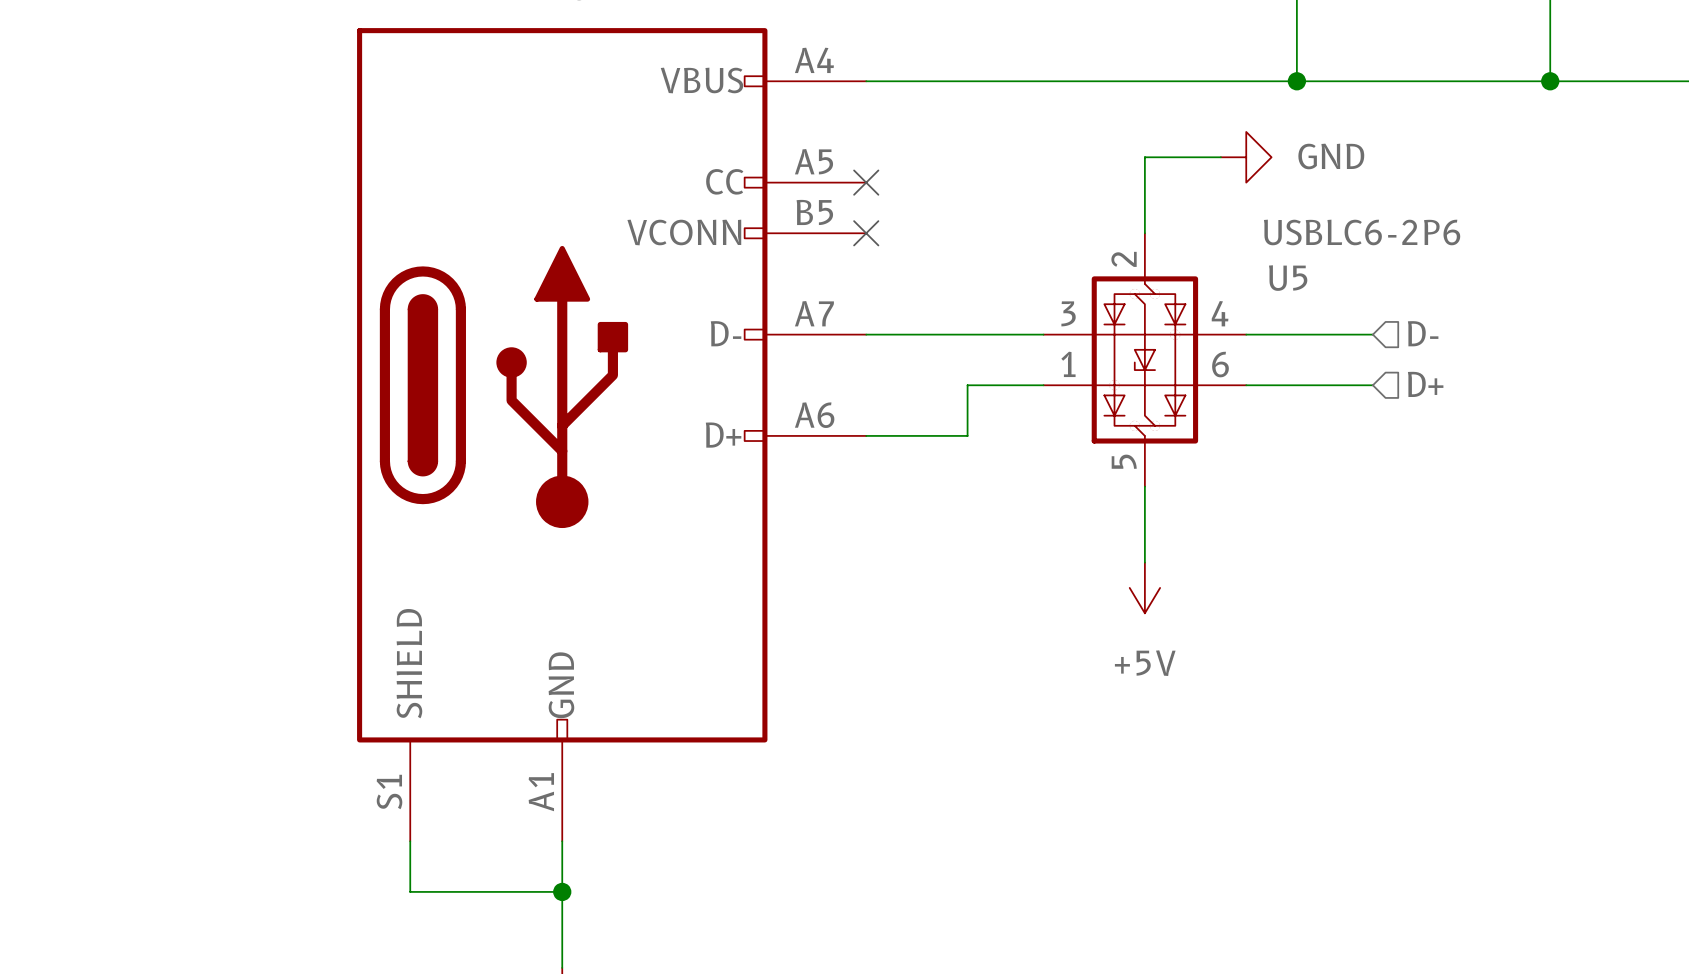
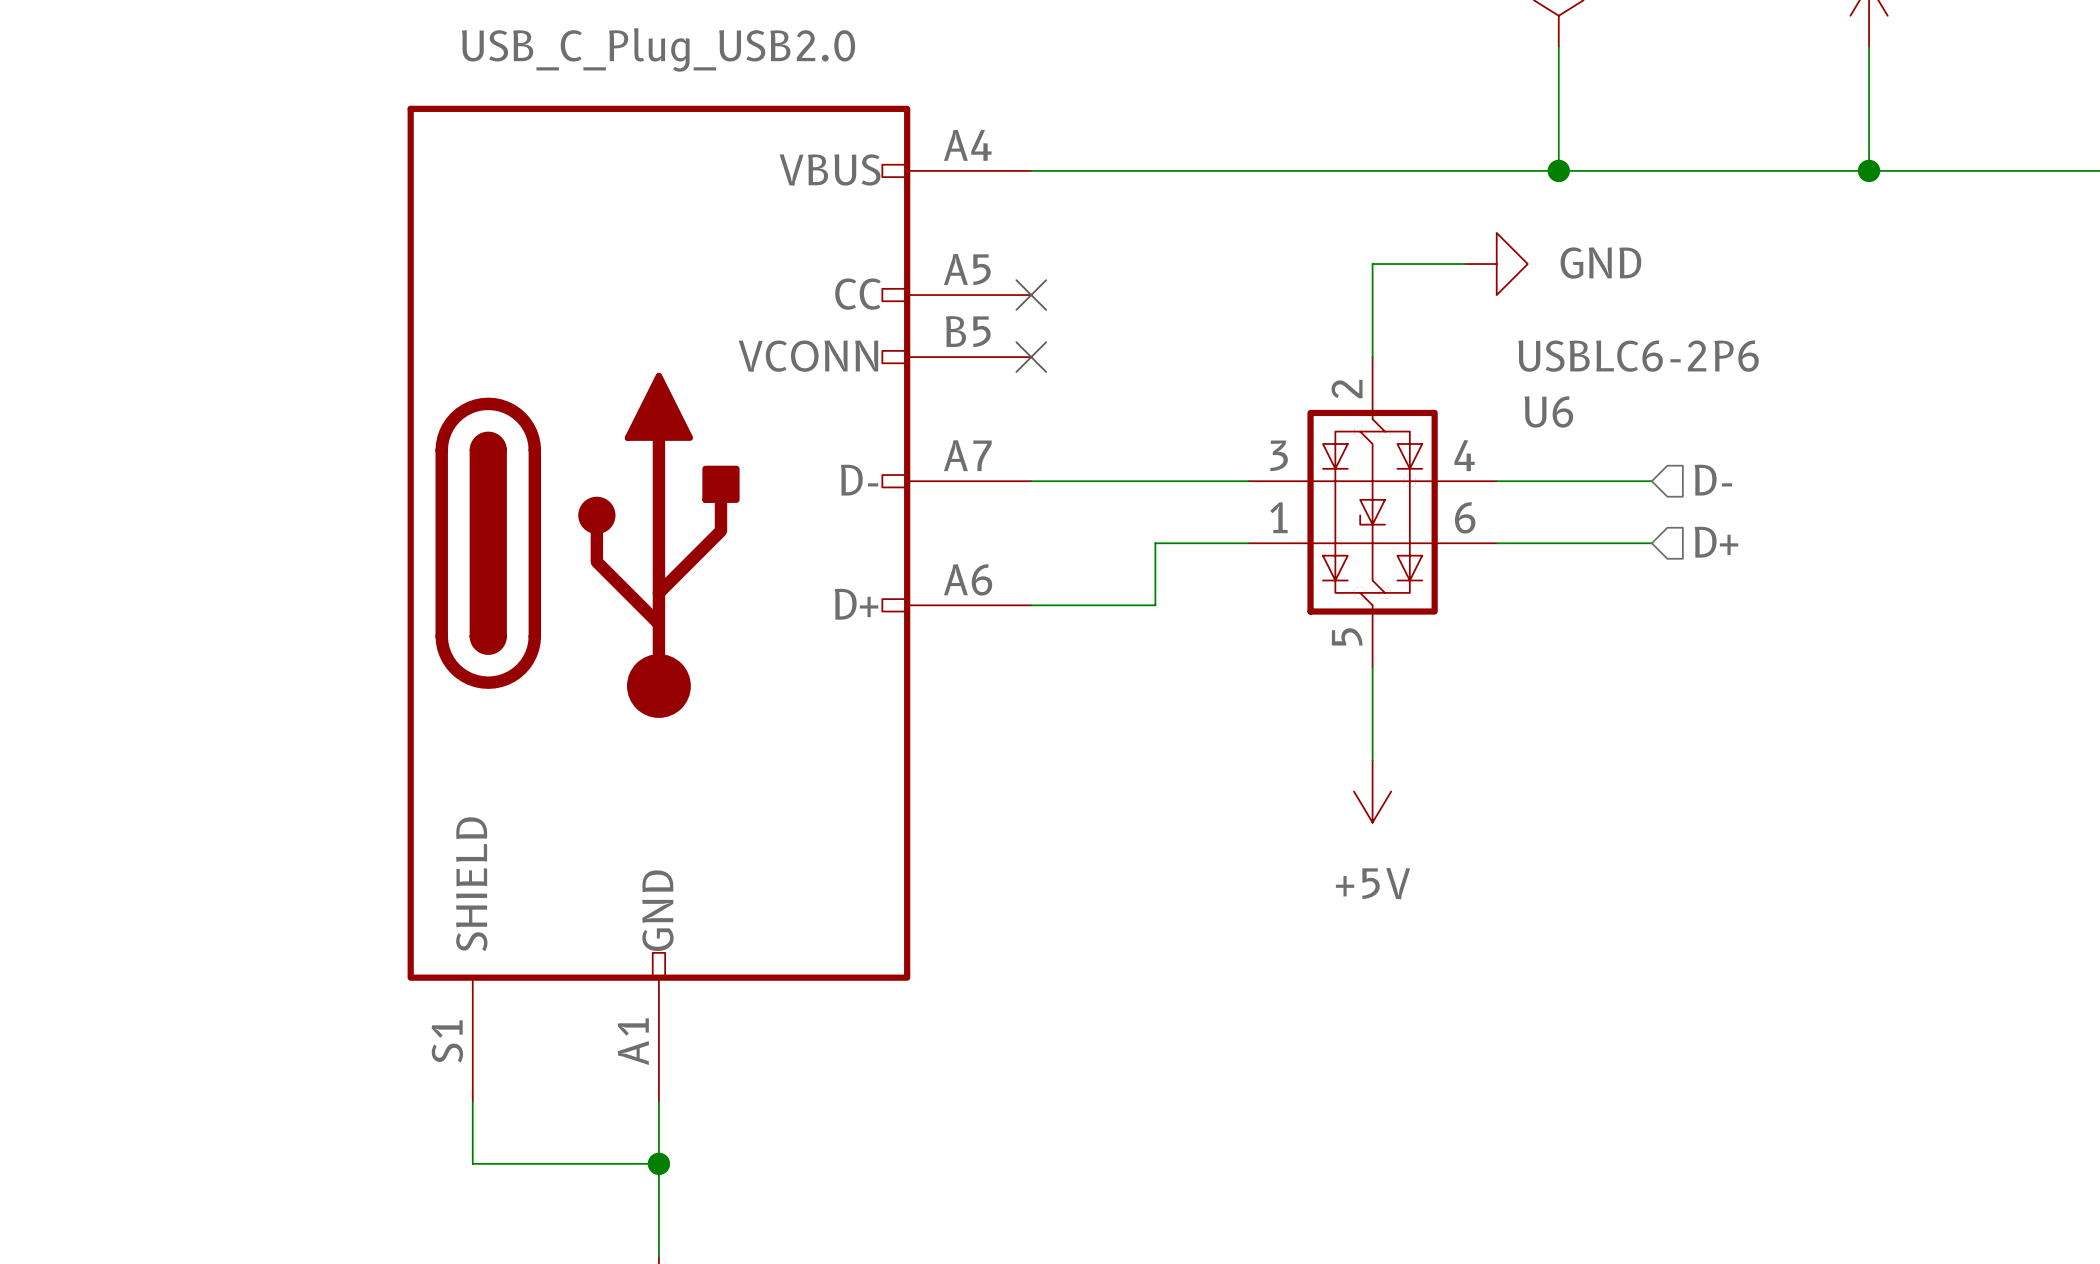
U5 name: U5 (1288, 278) -> U6 (1548, 411)

